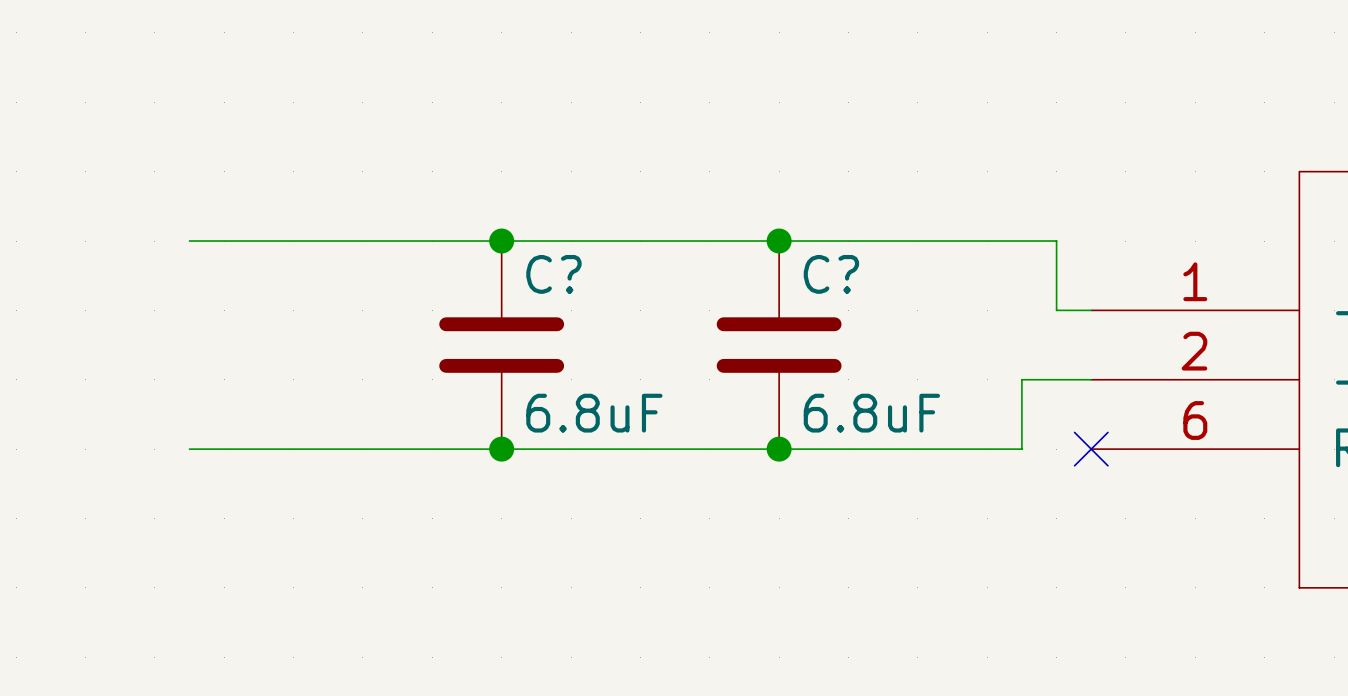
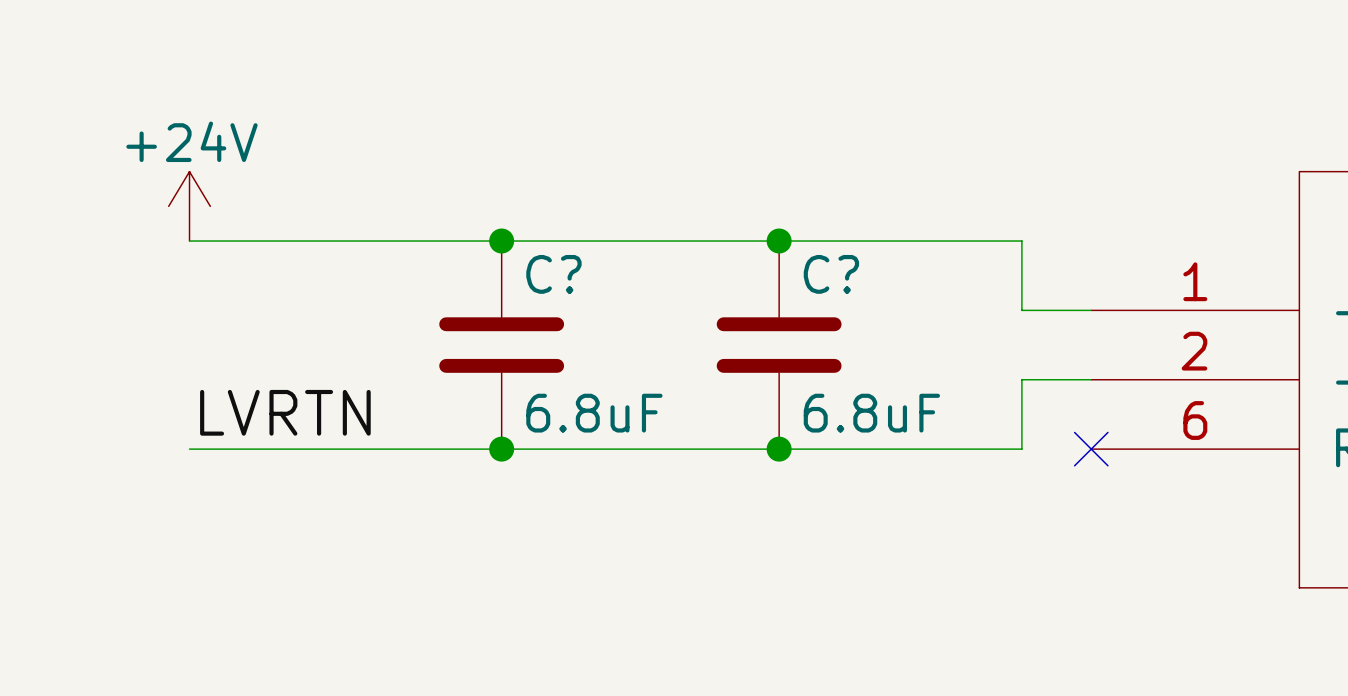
power symbol: none -> +24V (189, 206)
wire: (1021, 241) (1056, 241) (1056, 310) -> (1021, 241) (1021, 310) (1056, 310)
label: none -> LVRTN (285, 412)

